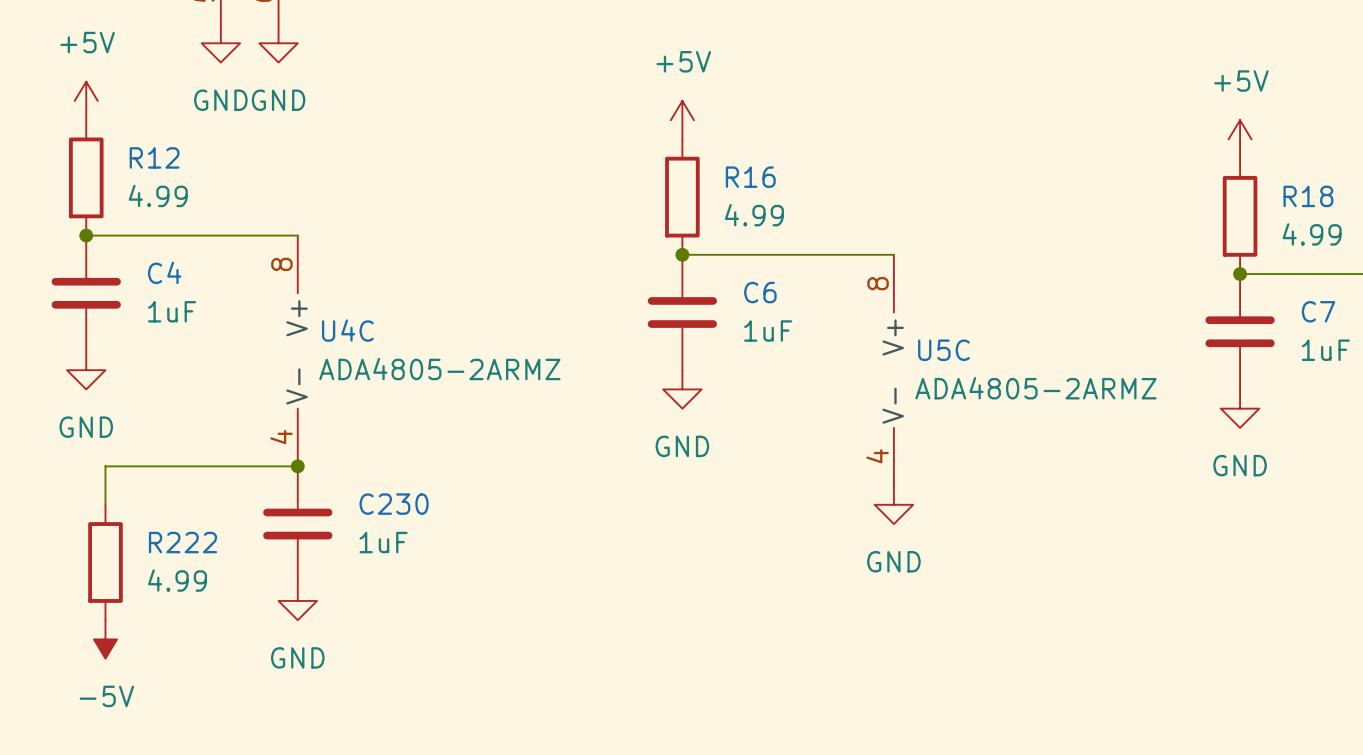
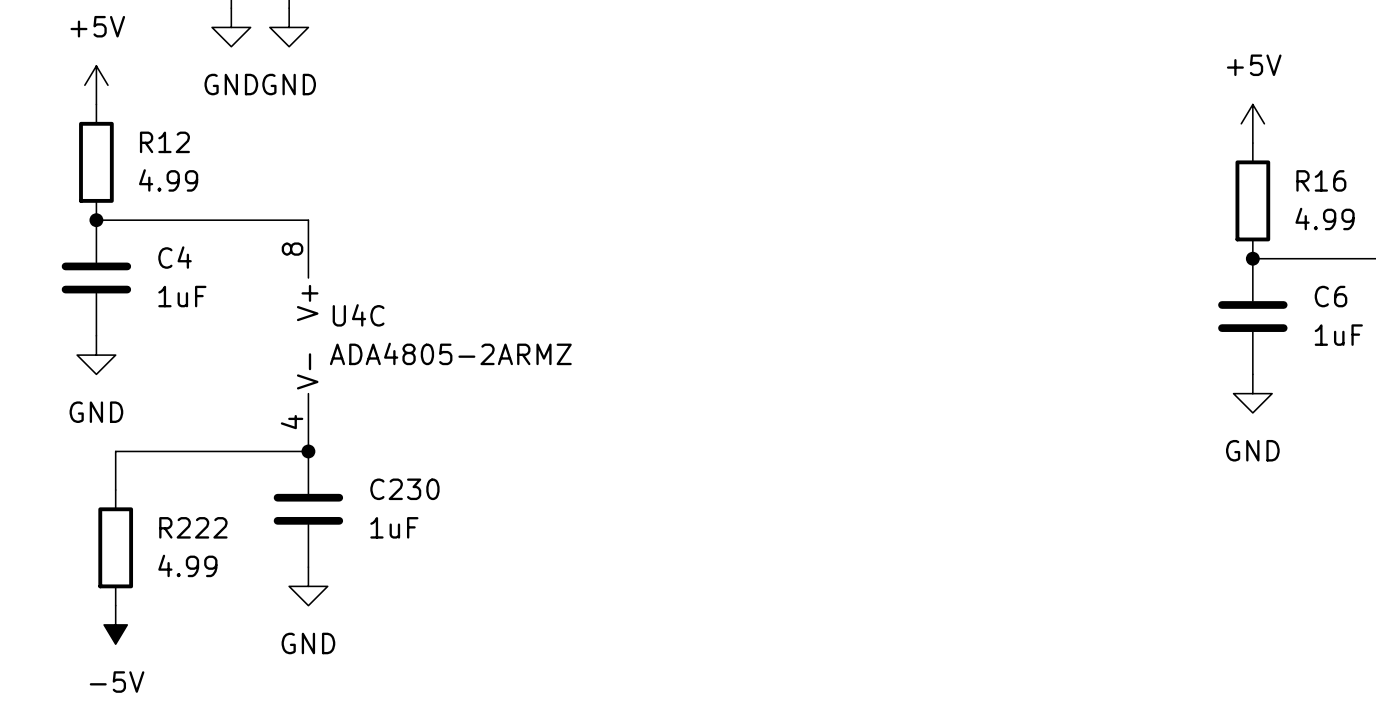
power symbol: +5V (682, 120) -> none
R18 name: R18 (1308, 196) -> R16 (1321, 180)
R16: 4.99 (682, 197) -> none
wire: (682, 254) (893, 254) -> none
junction: (682, 254) -> none
C7 name: C7 (1318, 311) -> C6 (1331, 296)
C6: 1uF (682, 312) -> none
U5C: ADA4805-2ARMZ (893, 370) -> none
power symbol: GND (682, 389) -> none
power symbol: GND (893, 504) -> none

